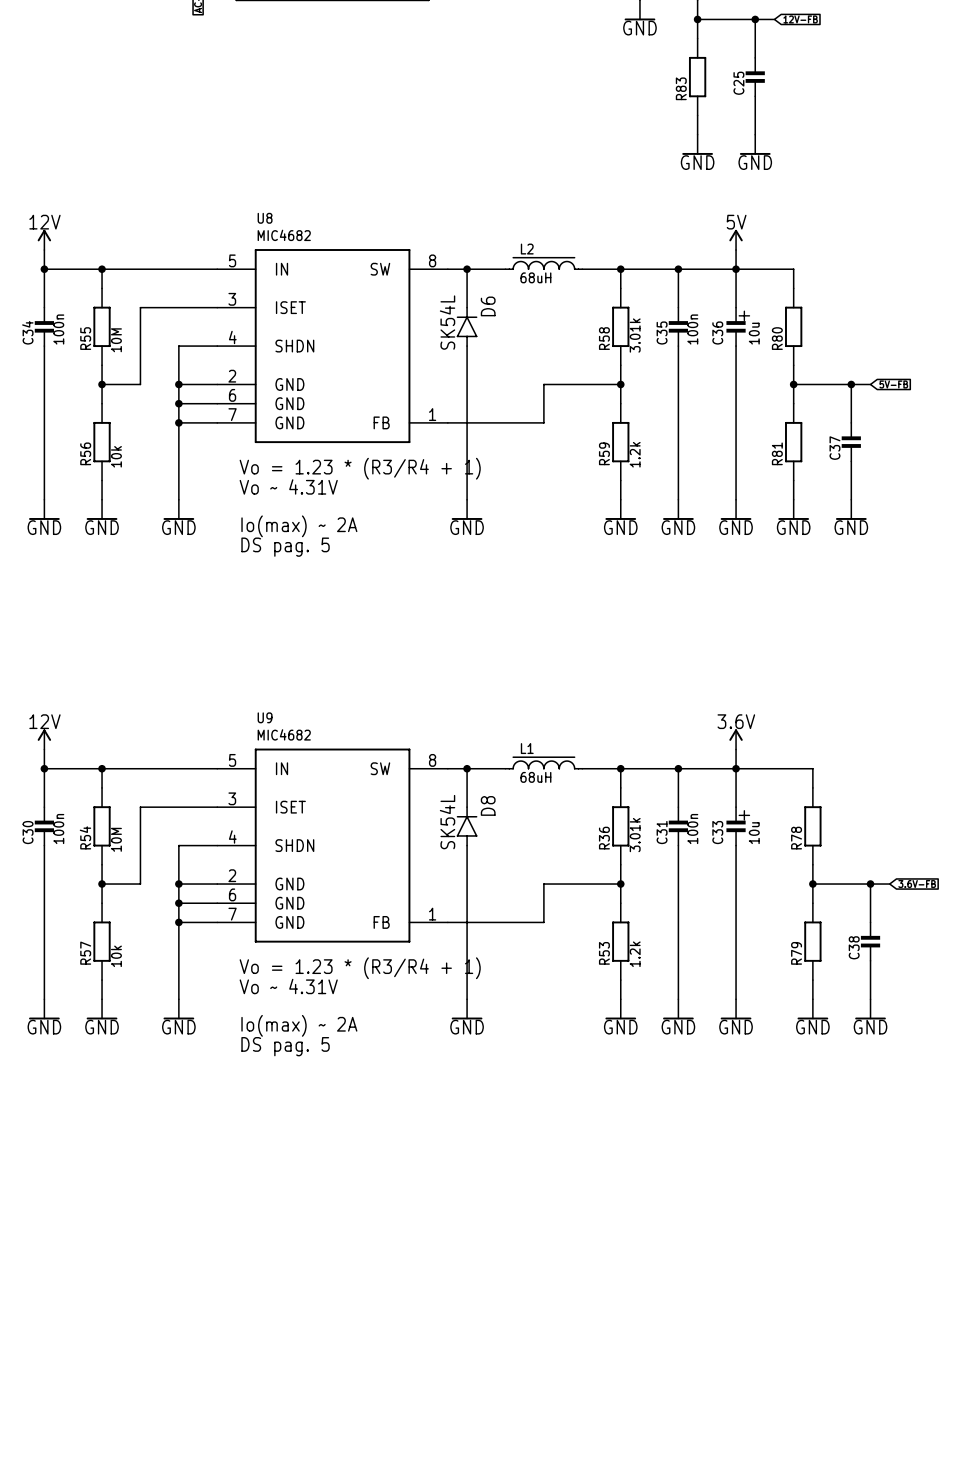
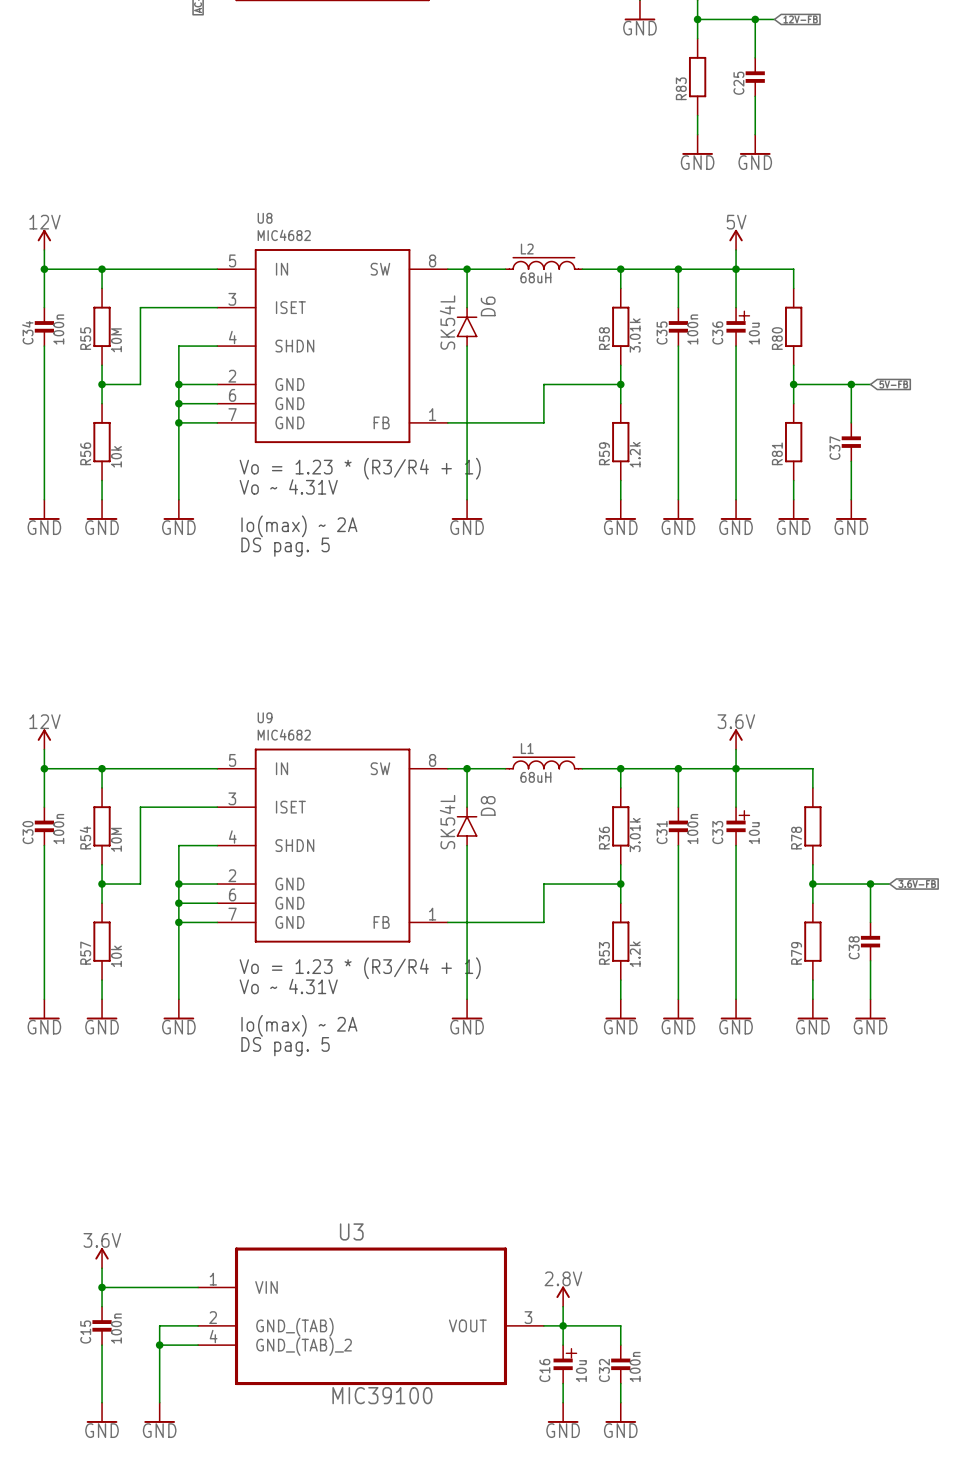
power symbol: none -> 3.6V (102, 1258)
wire: none -> (102, 1268) (102, 1306)
wire: none -> (102, 1287) (198, 1287)
junction: none -> (102, 1287)
power symbol: none -> 2.8V (563, 1296)
wire: none -> (563, 1306) (563, 1345)
U3: none -> MIC39100 (371, 1316)
C15: none -> 100n (102, 1325)
wire: none -> (198, 1325) (159, 1325) (159, 1402)
wire: none -> (543, 1325) (620, 1325) (620, 1345)
junction: none -> (563, 1325)
wire: none -> (102, 1345) (102, 1402)
wire: none -> (159, 1345) (198, 1345)
junction: none -> (159, 1345)
C16: none -> 10u (563, 1364)
C32: none -> 100n (620, 1364)
wire: none -> (563, 1383) (563, 1402)
wire: none -> (620, 1383) (620, 1402)
power symbol: none -> GND (102, 1412)
power symbol: none -> GND (159, 1412)
power symbol: none -> GND (563, 1412)
power symbol: none -> GND (620, 1412)

